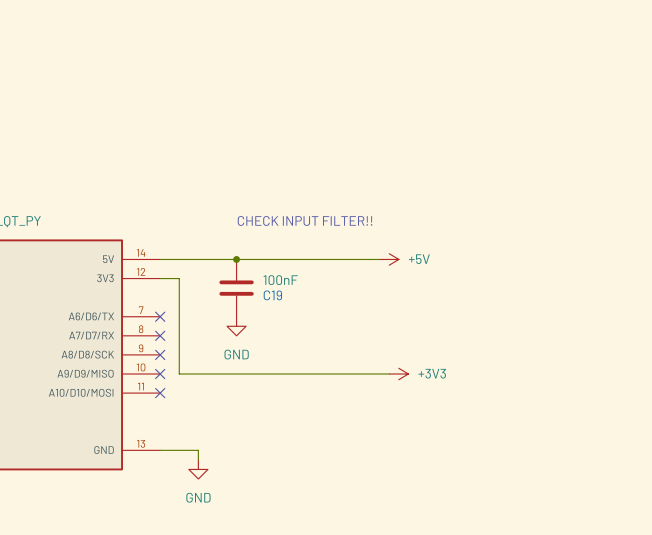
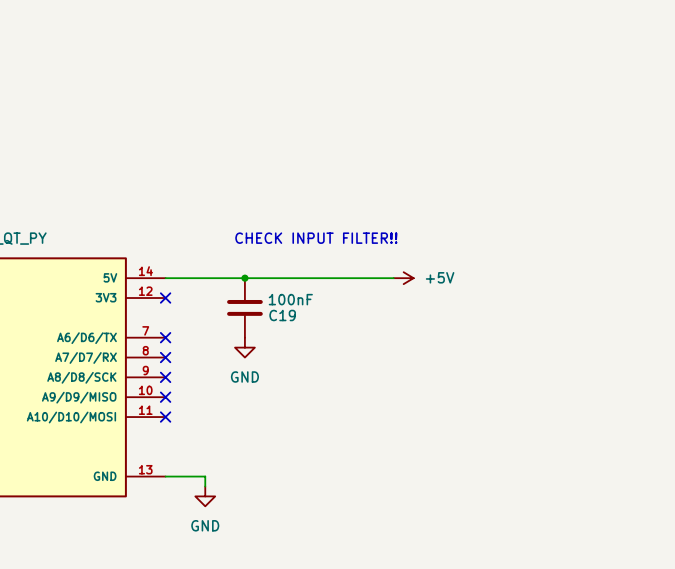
wire: (160, 278) (179, 278) (179, 374) (389, 374) -> none
no-connect mark: none -> (165, 298)
power symbol: +3V3 (398, 374) -> none

